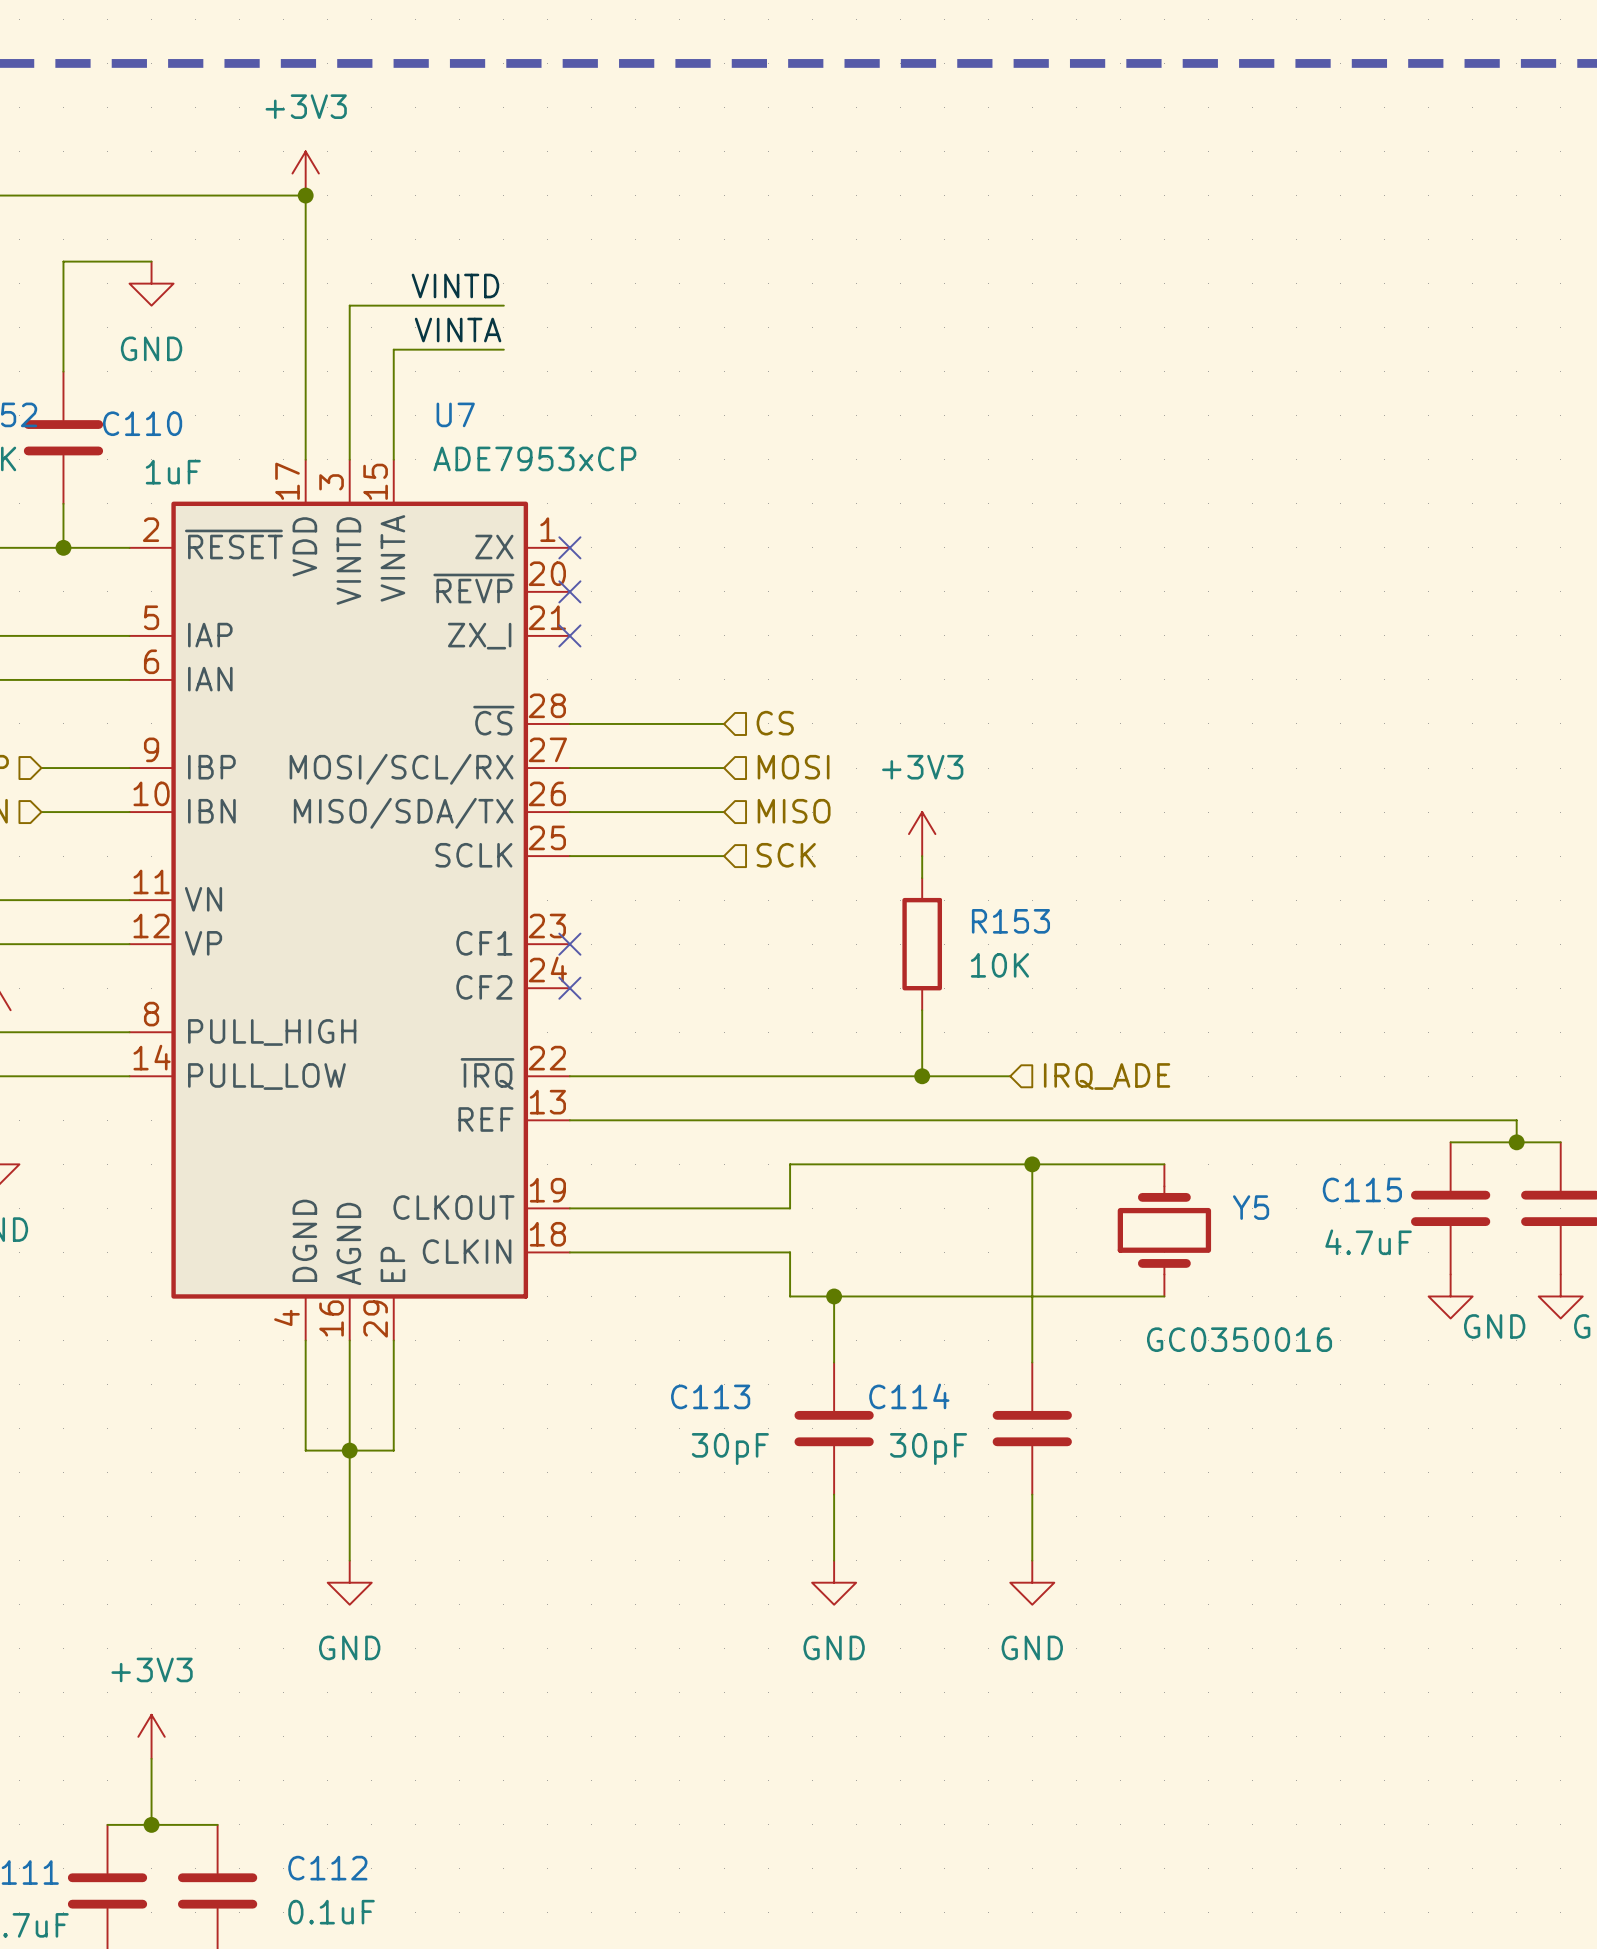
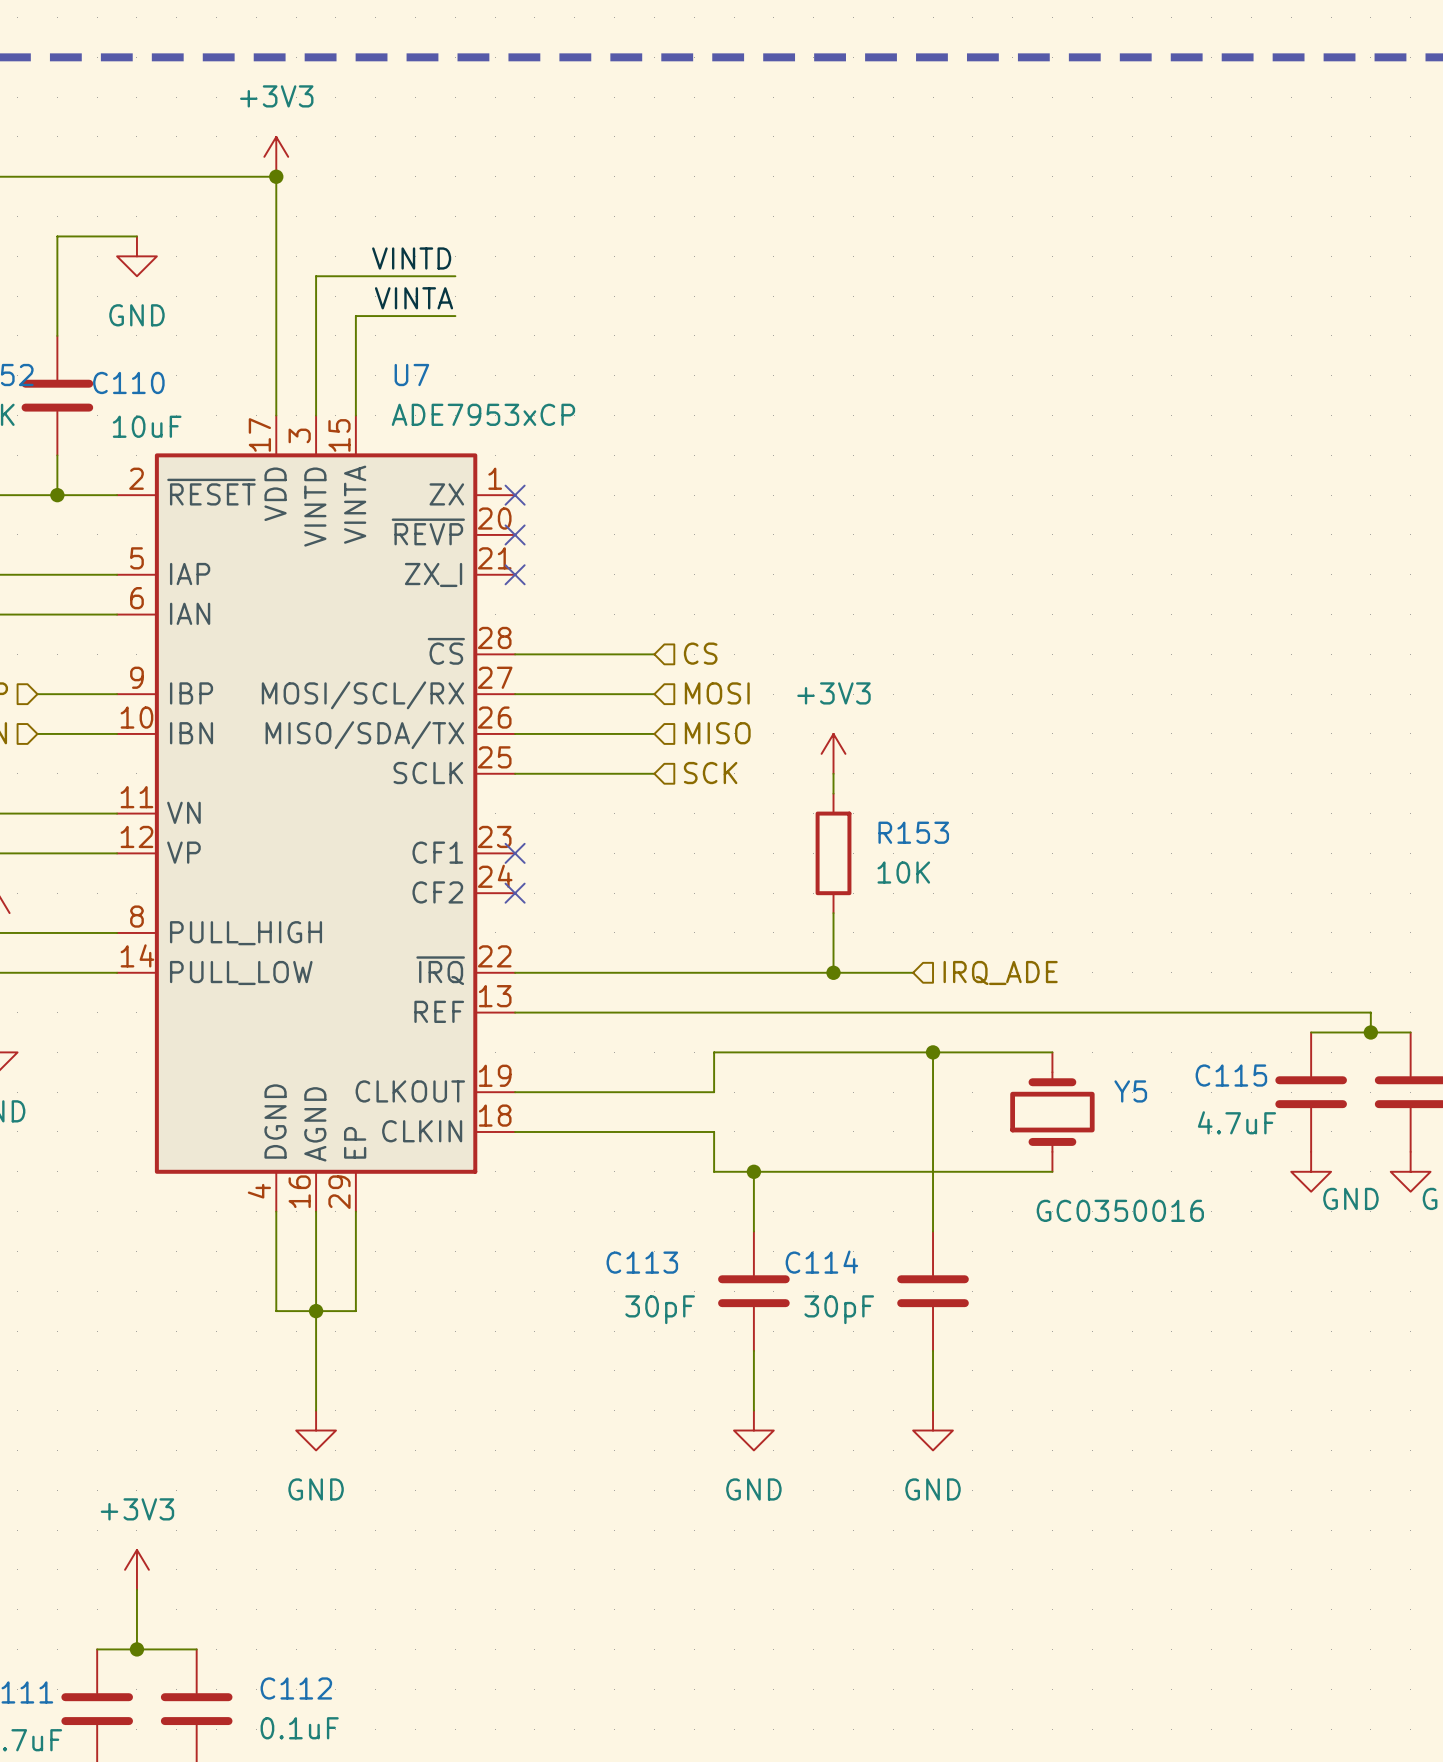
C110 value: 1uF (173, 472) -> 10uF (147, 426)

